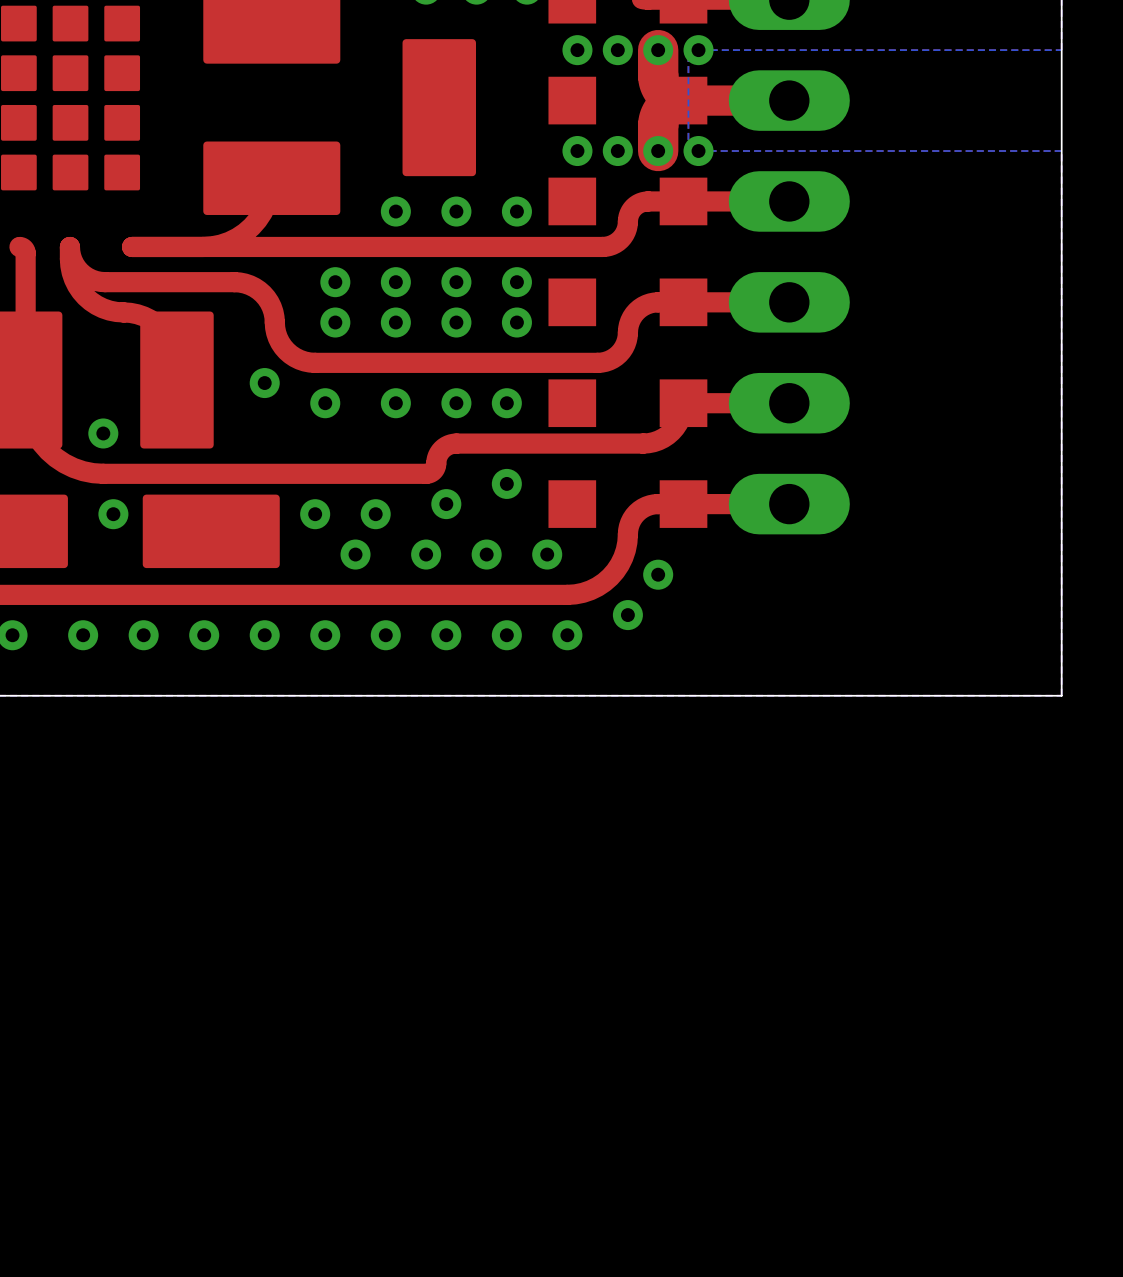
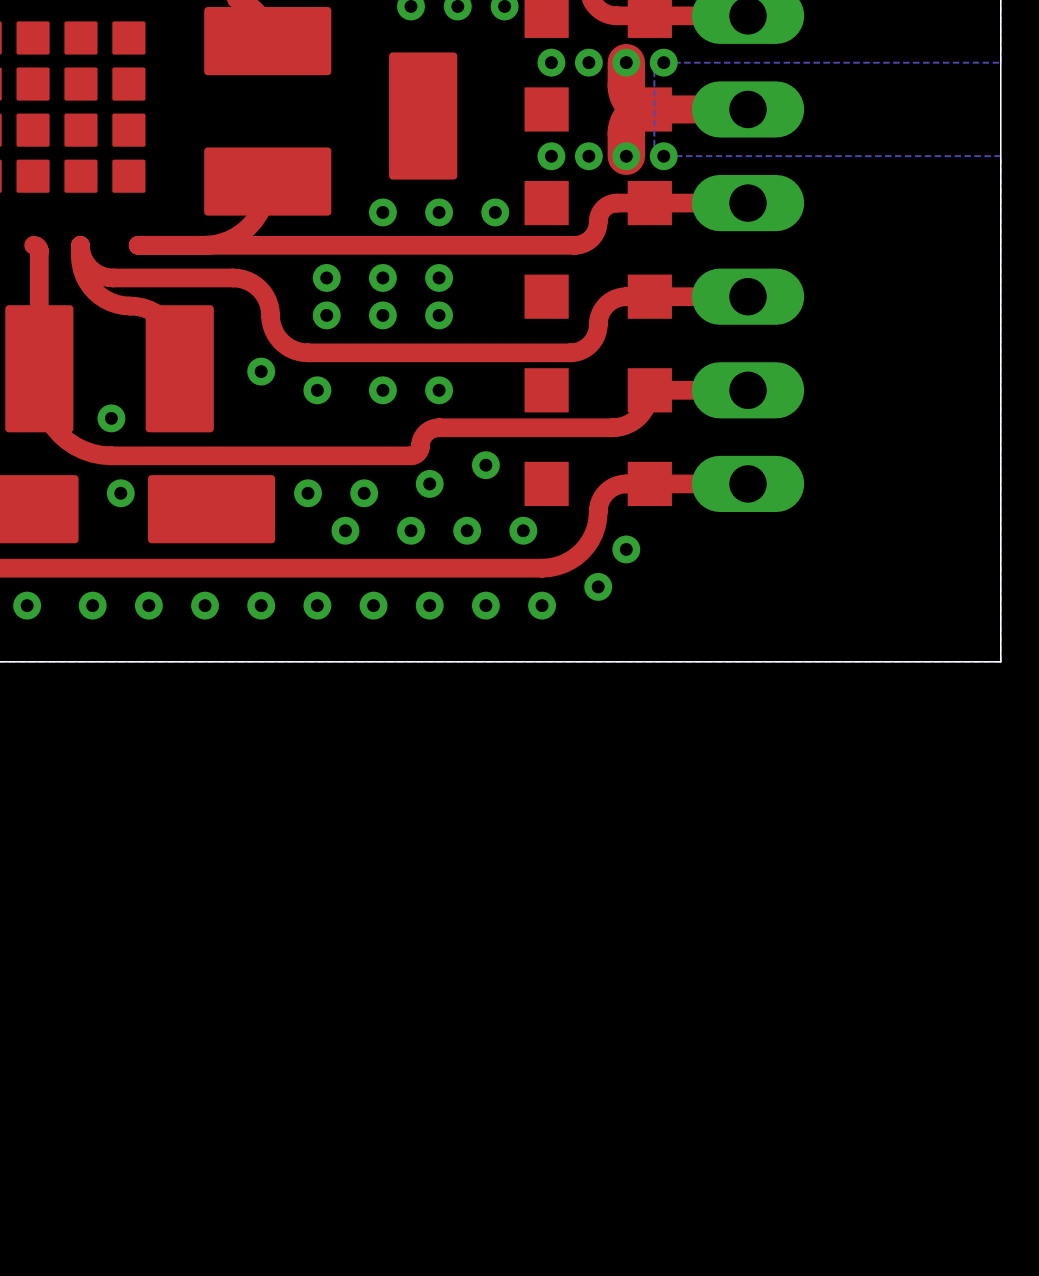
via: (516, 282) -> none
via: (516, 322) -> none
via: (506, 403) -> none

